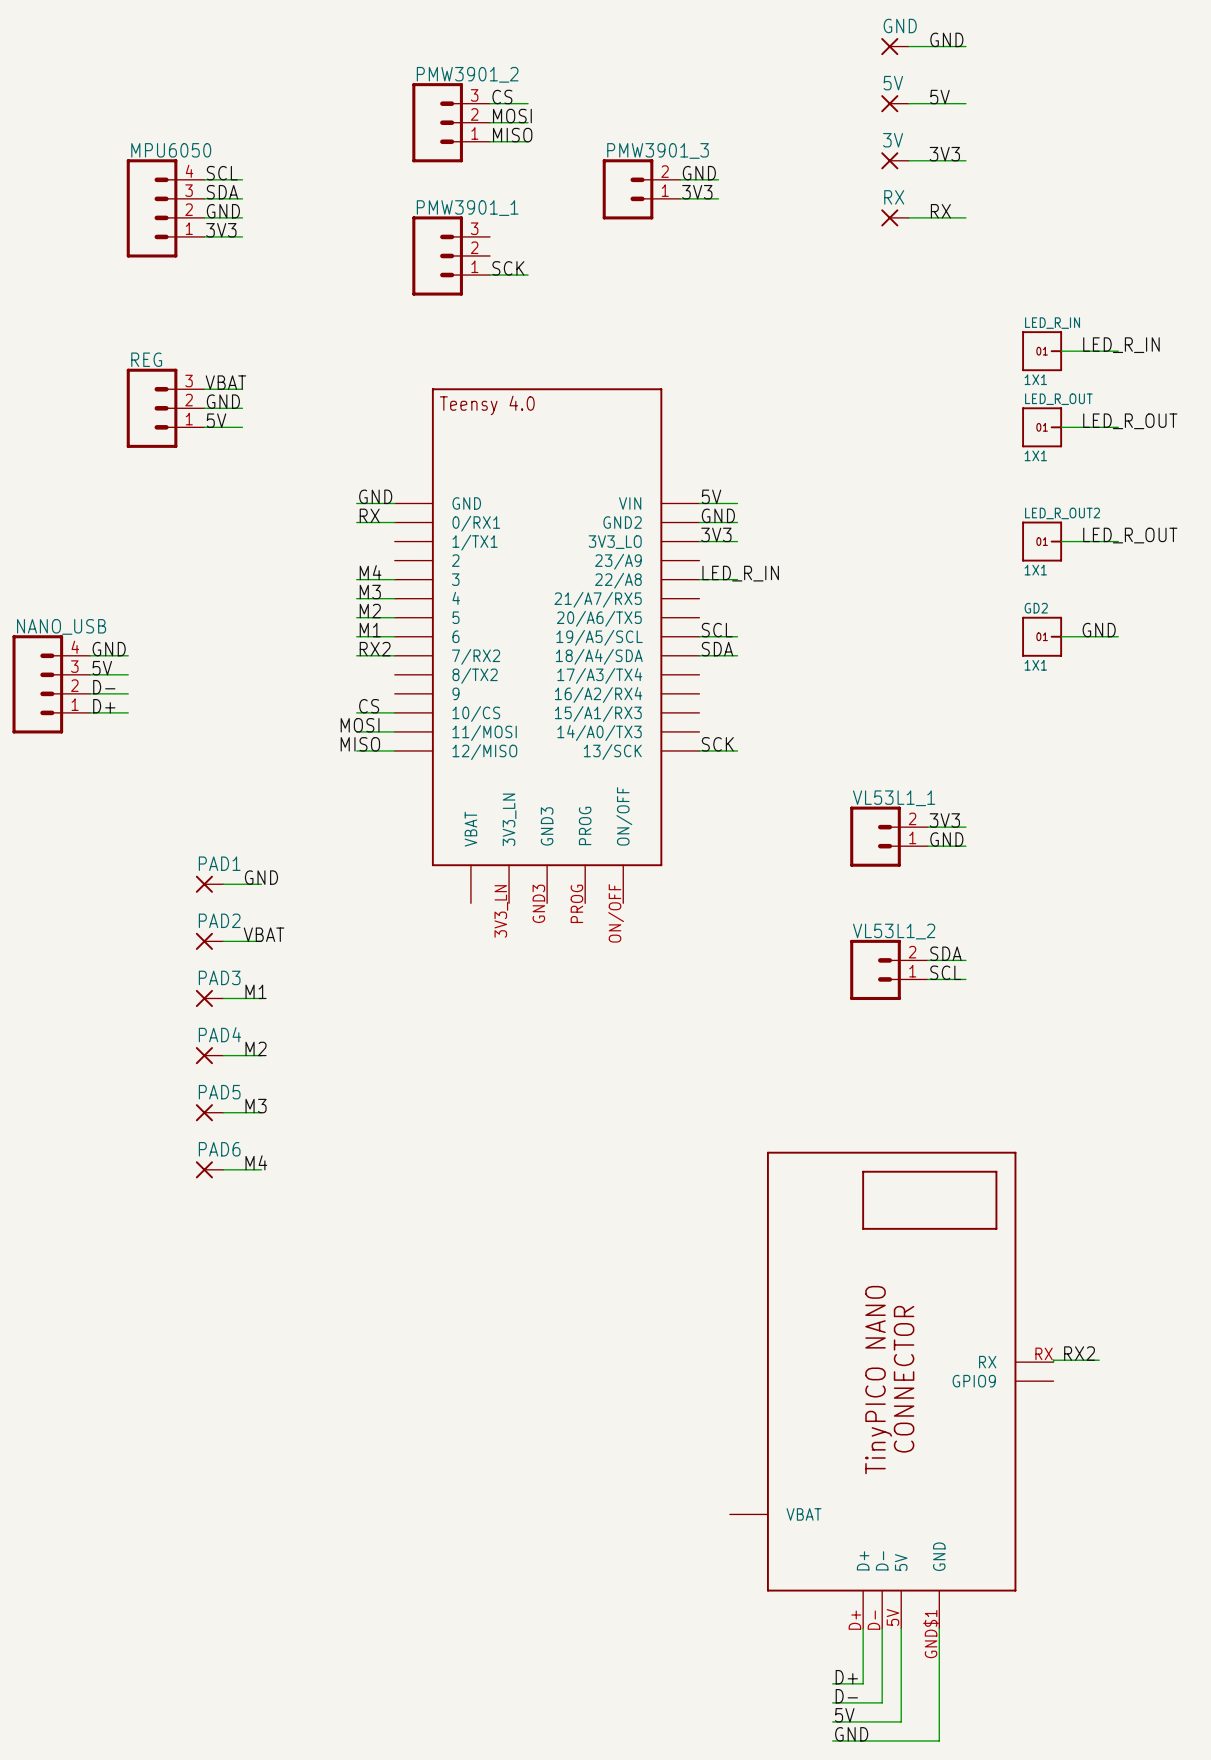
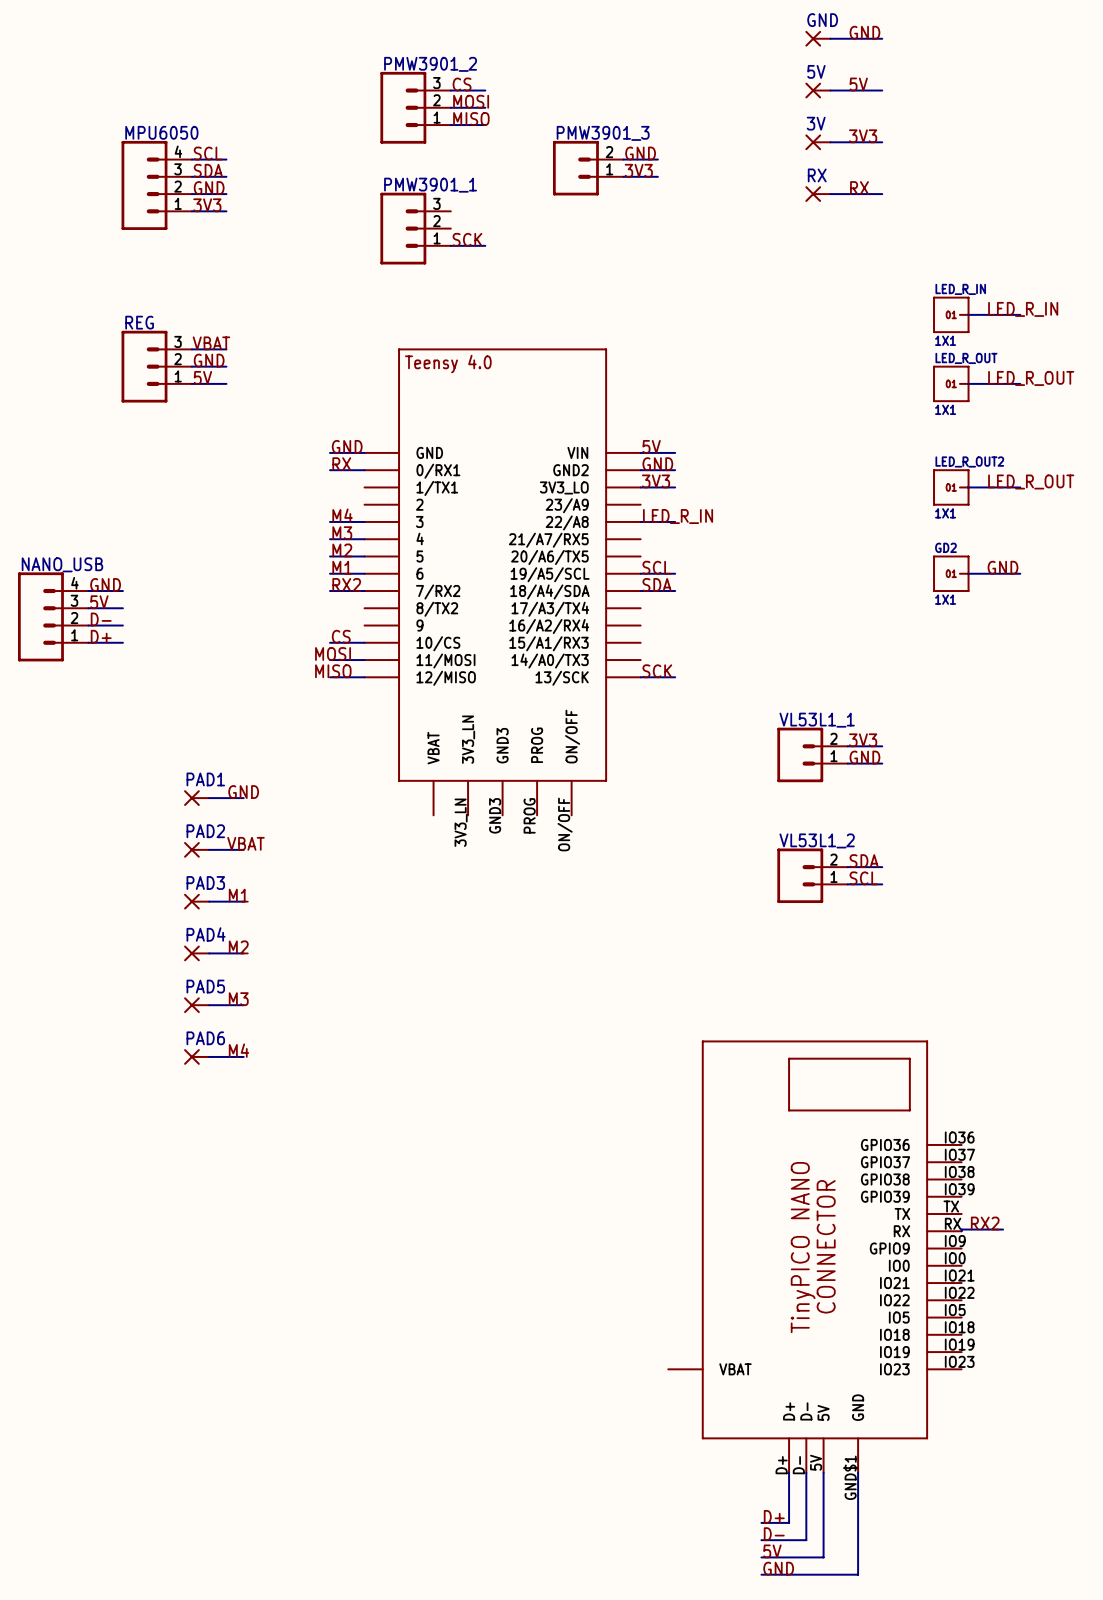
part symbol: [729, 1151, 1054, 1629] -> [668, 1040, 962, 1473]

